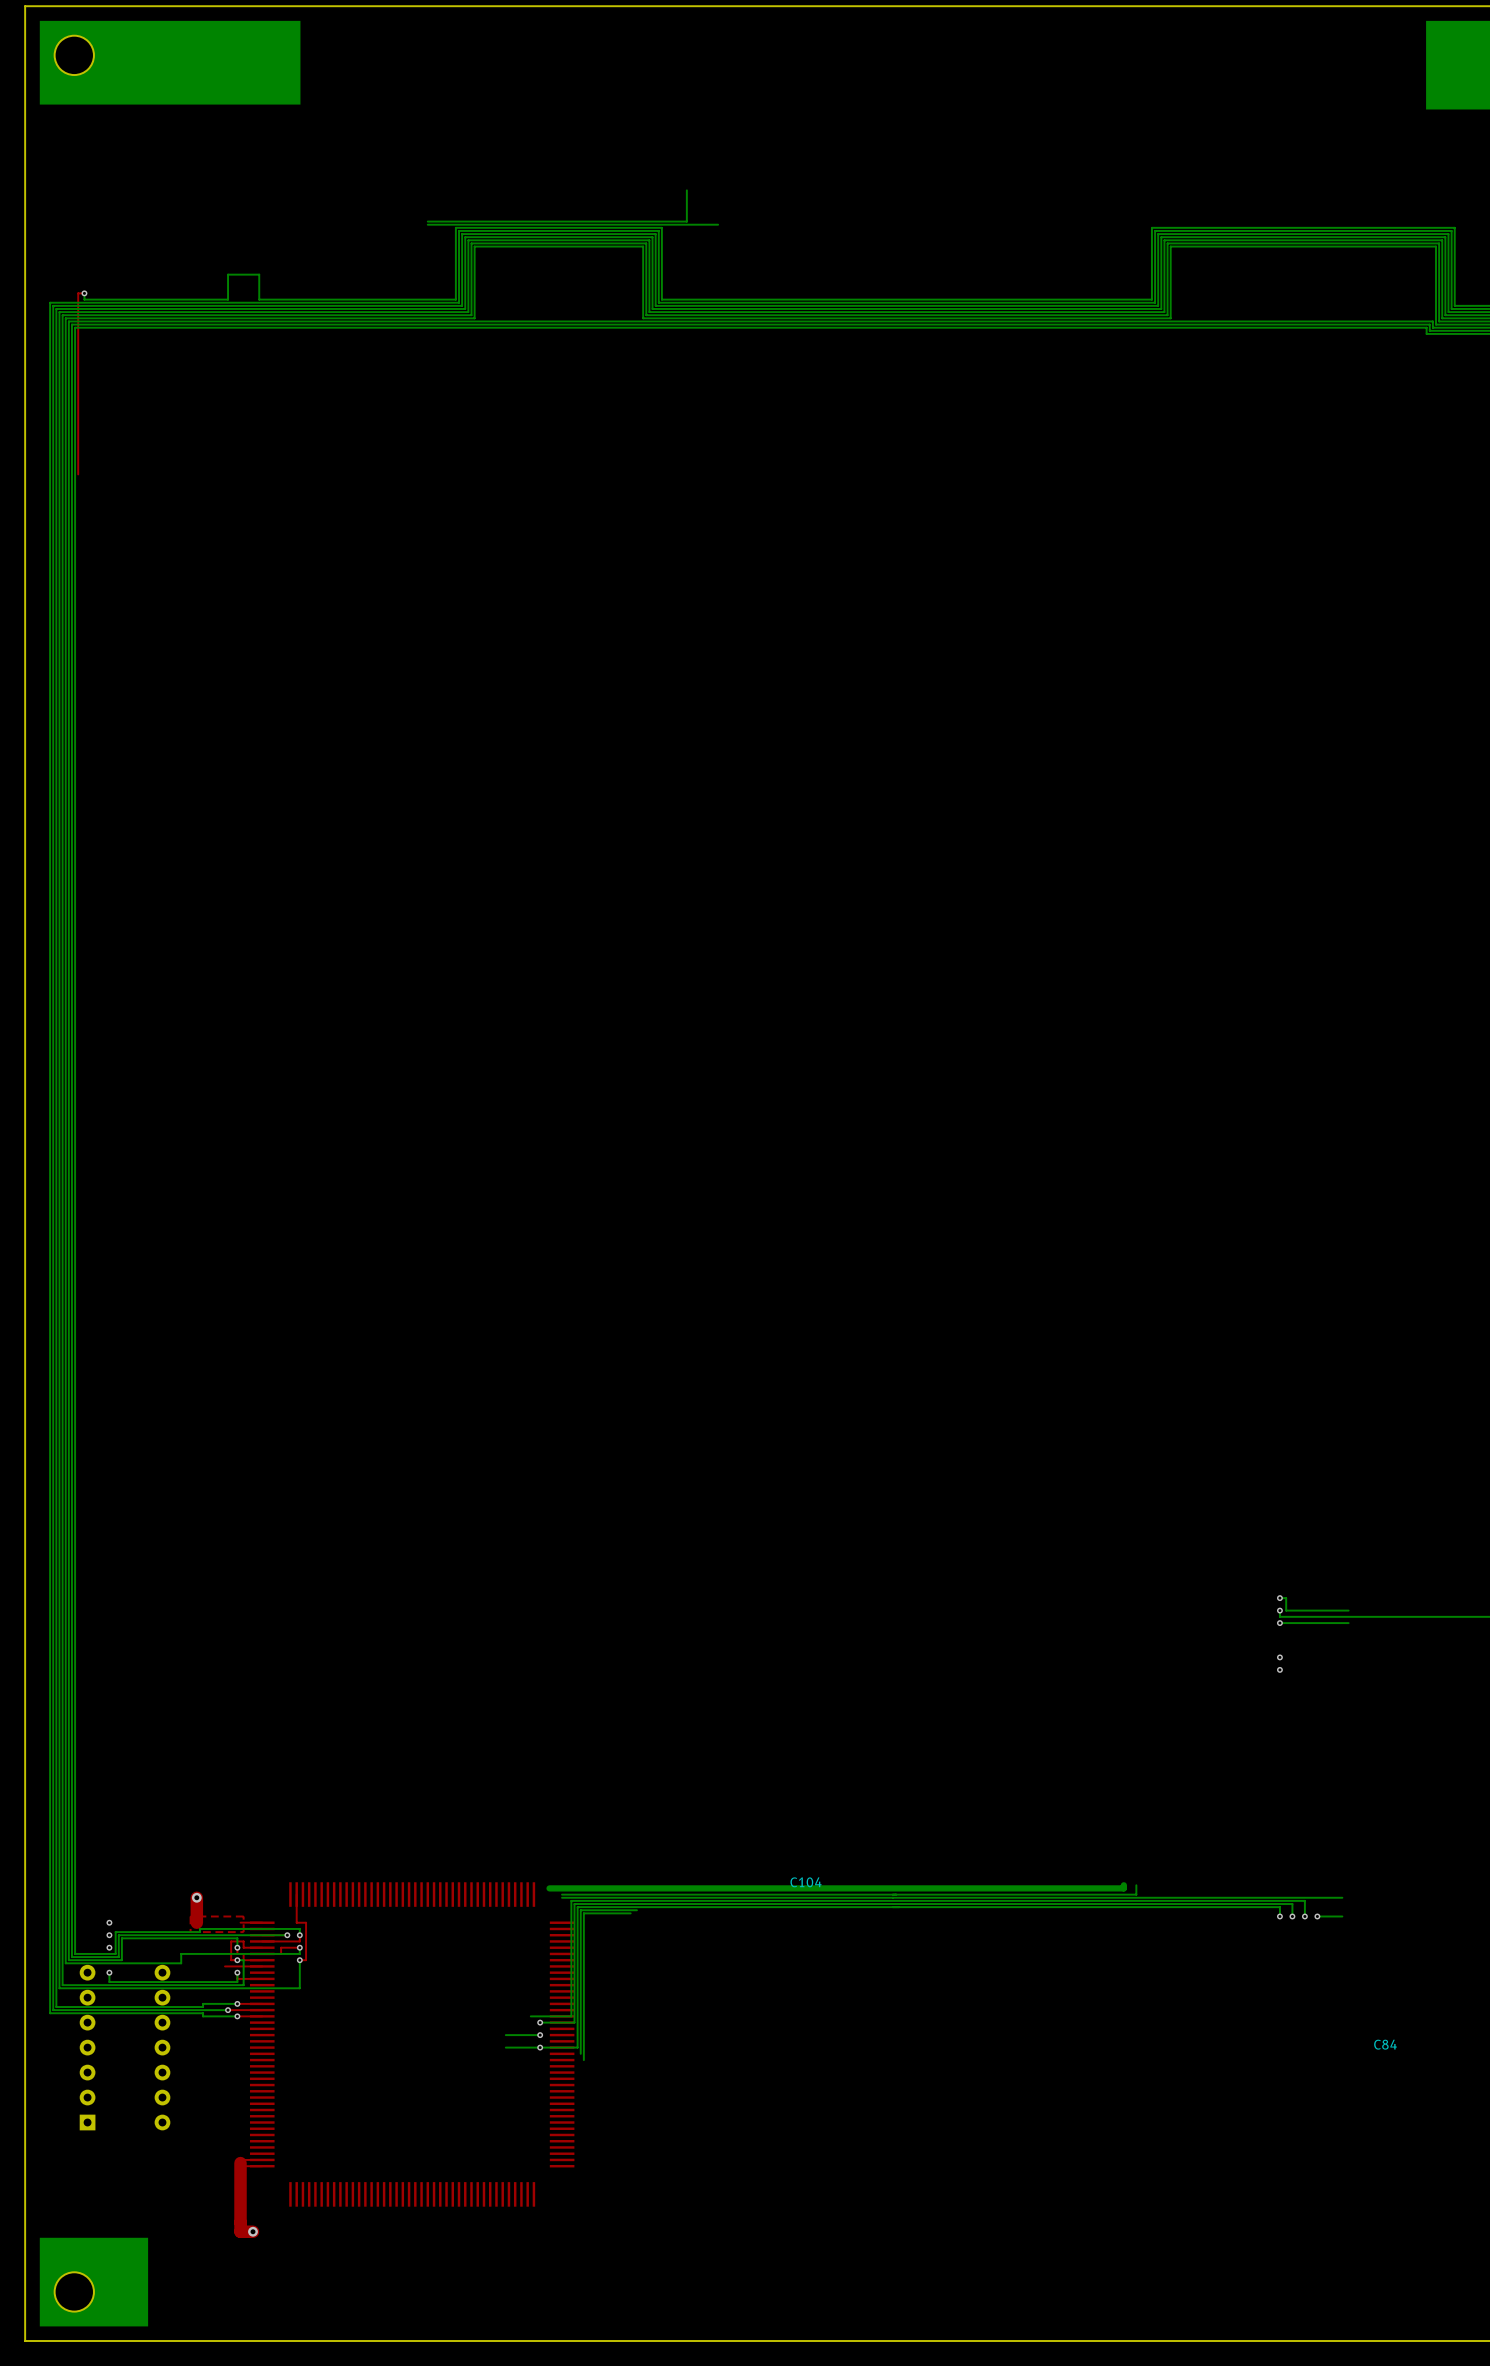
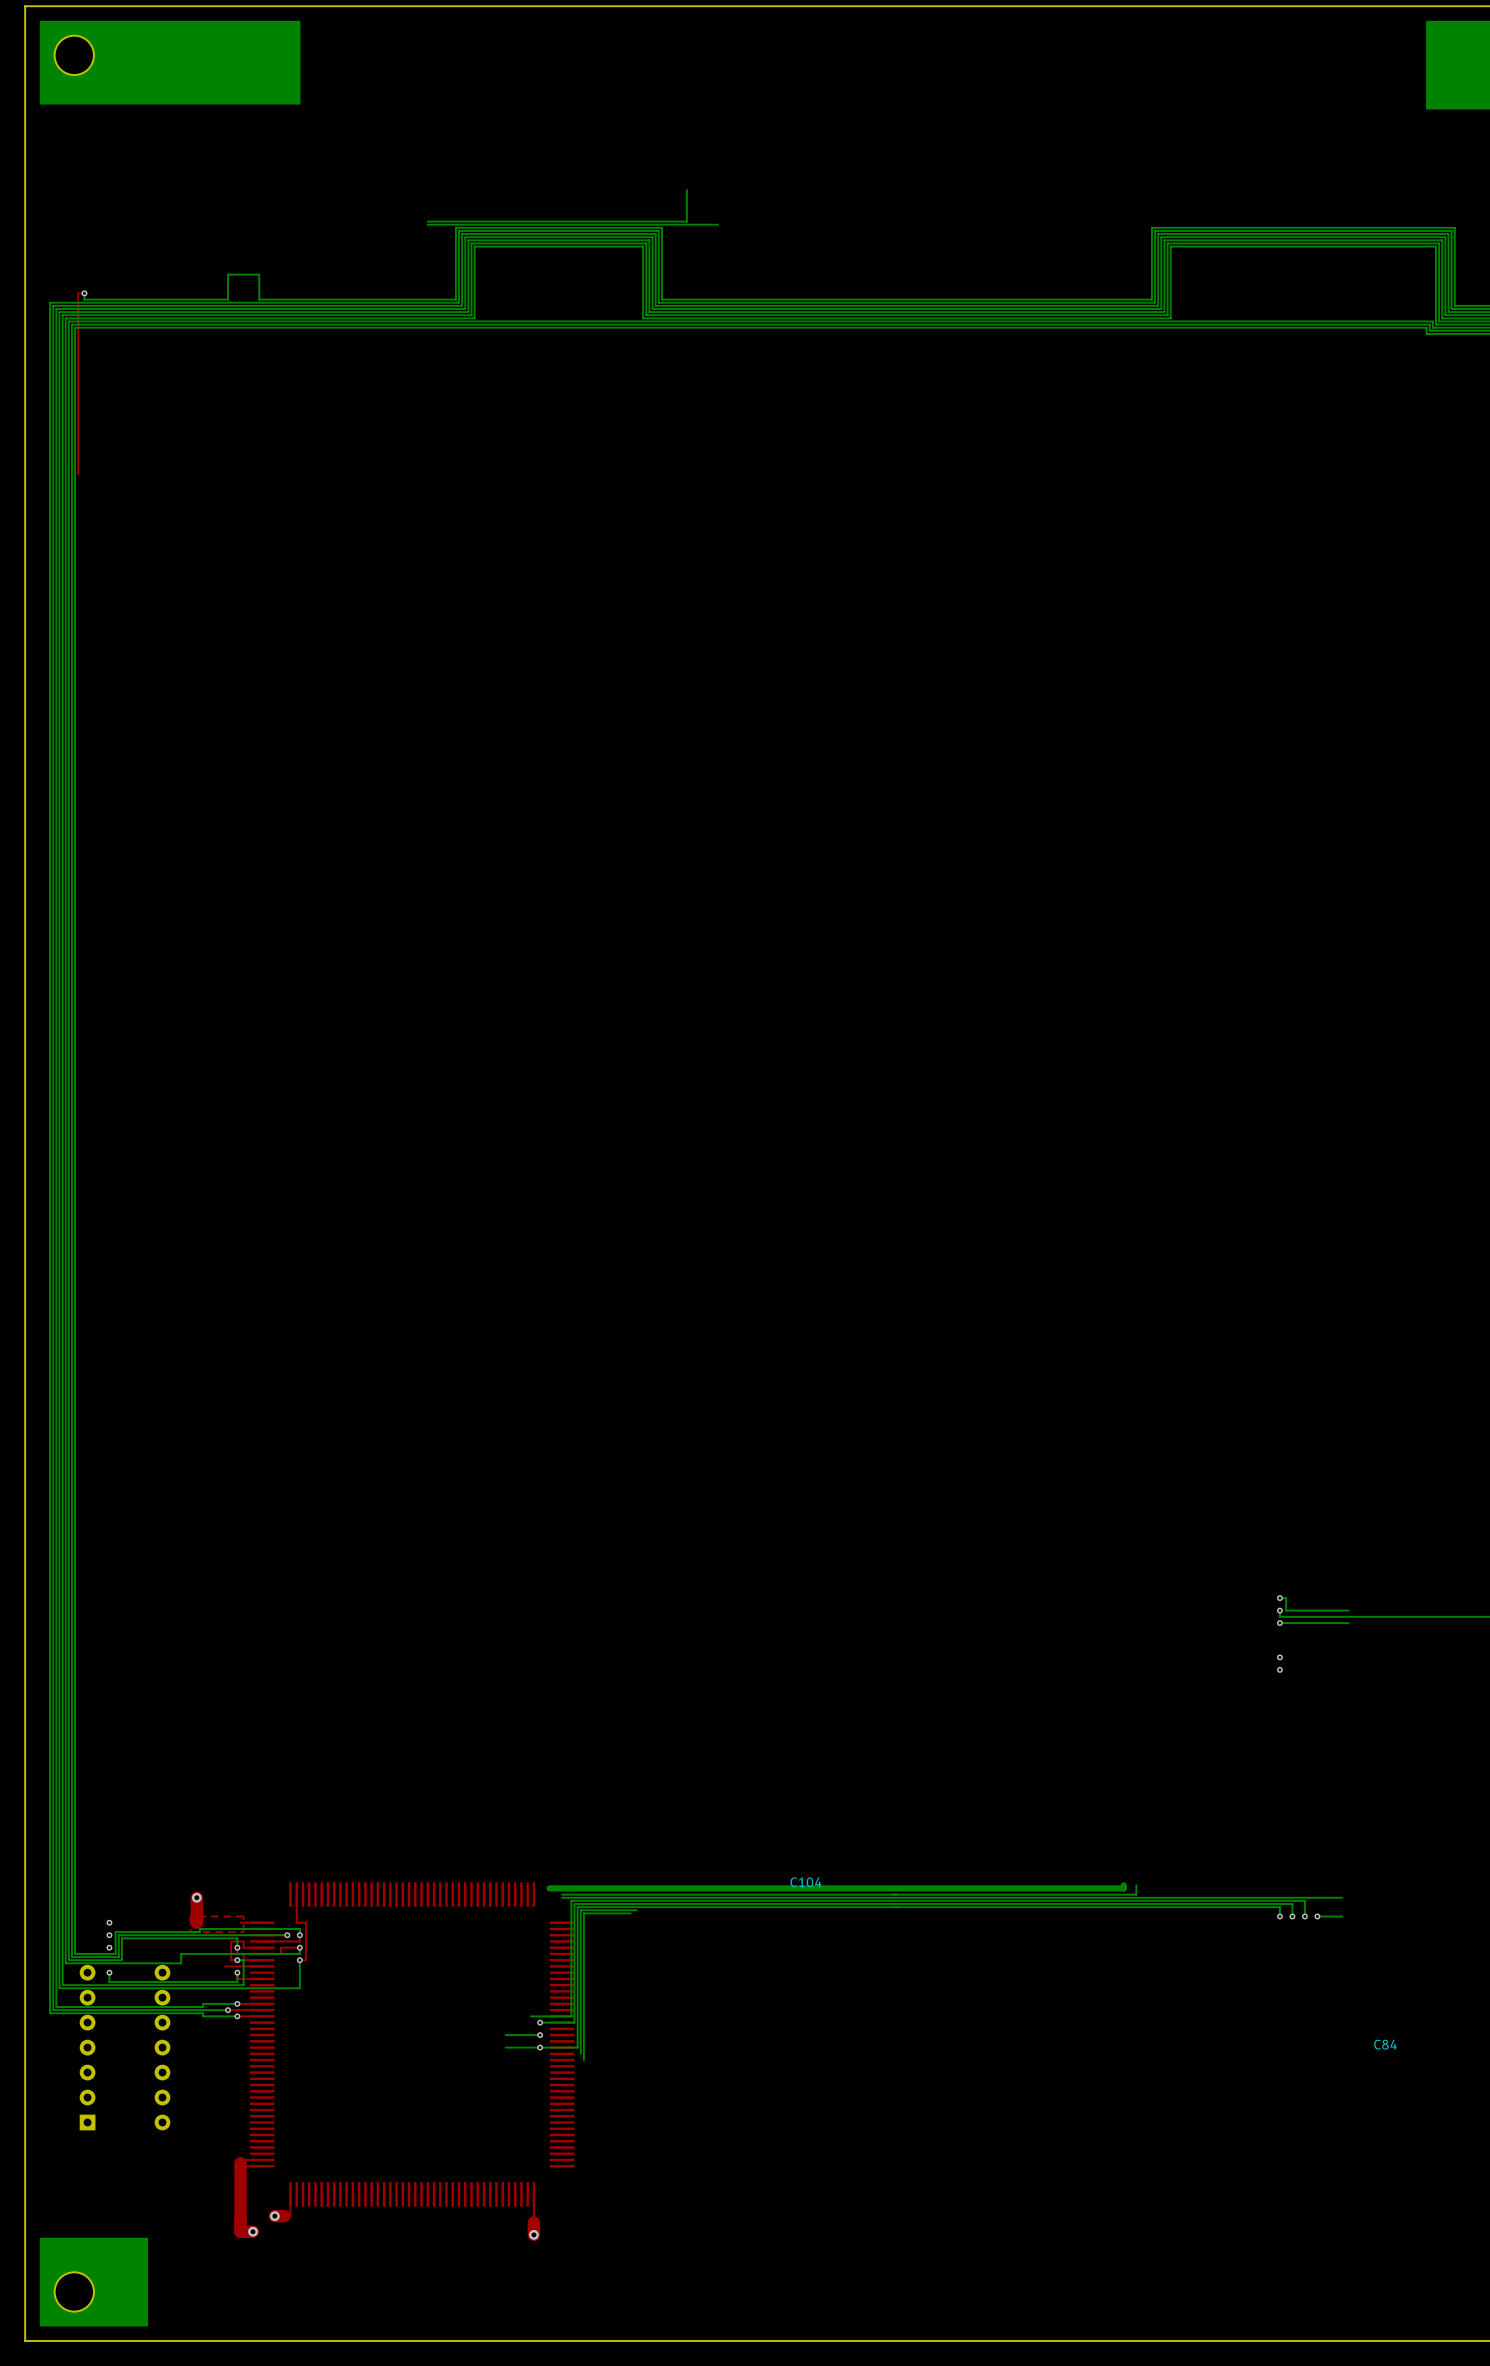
top track: none -> (290, 2194) (290, 2216) (274, 2216)
top track: none -> (533, 2194) (533, 2234)
via: none -> (274, 2216)
via: none -> (533, 2234)

